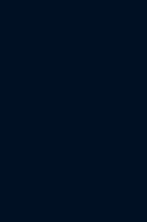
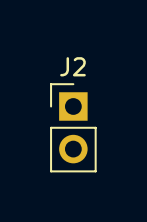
J2: none -> (73, 127)

